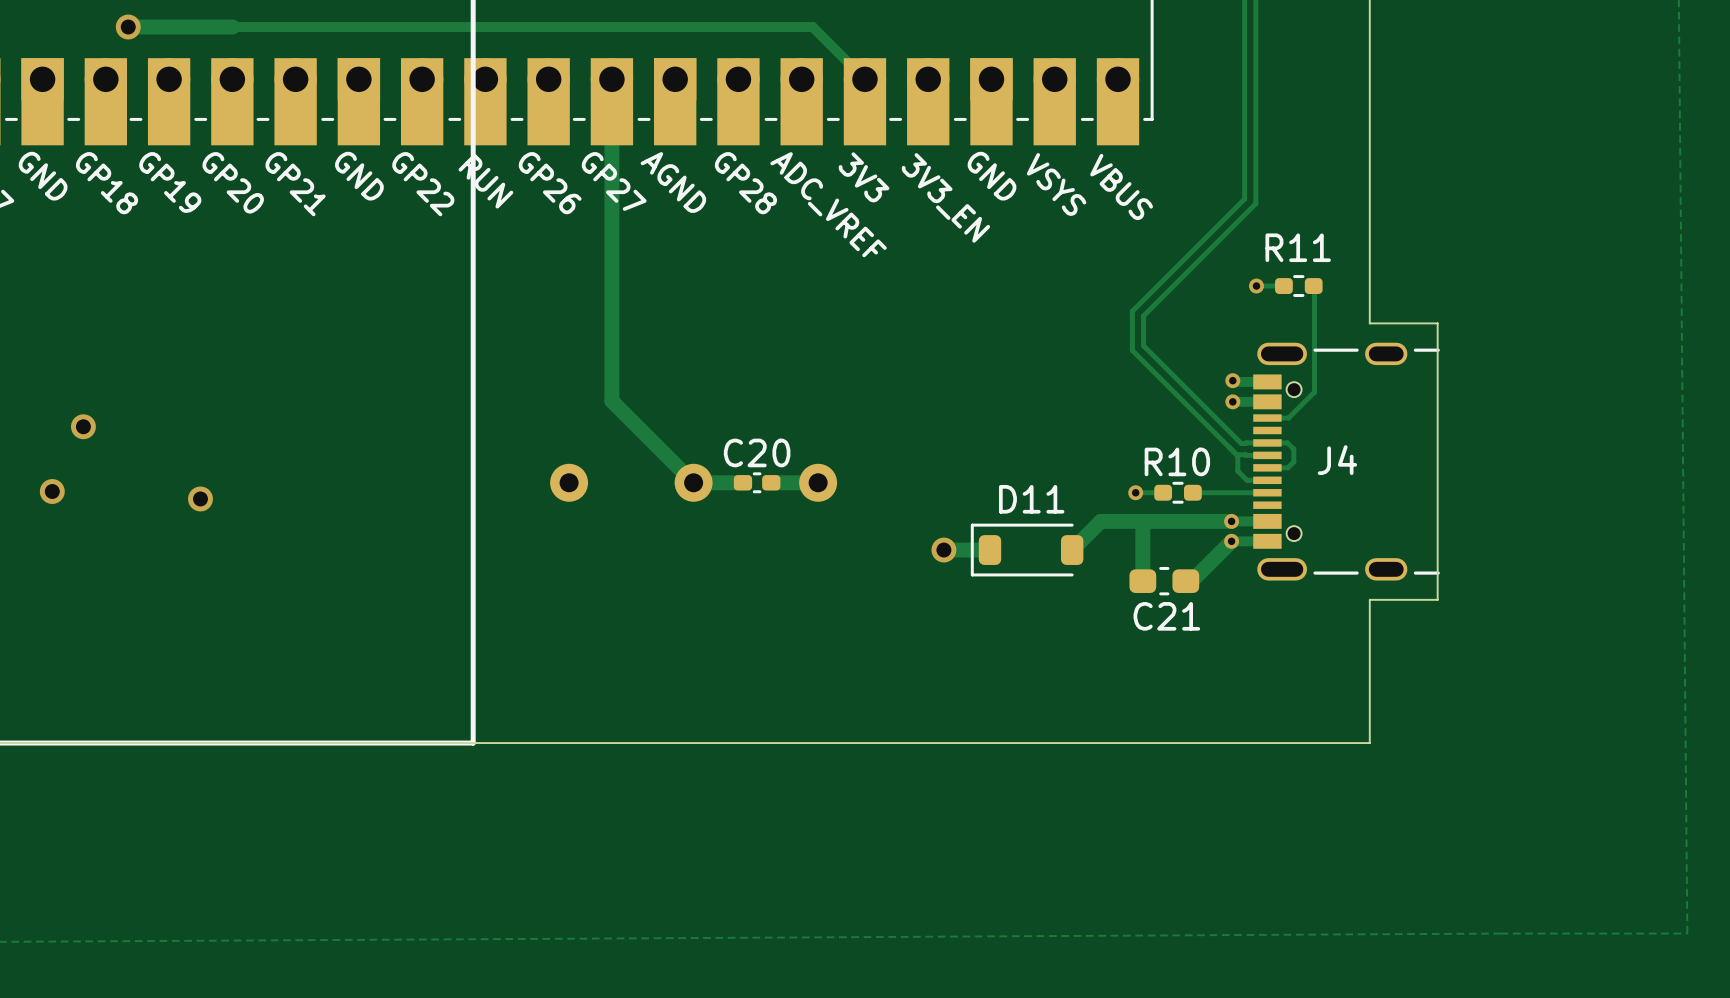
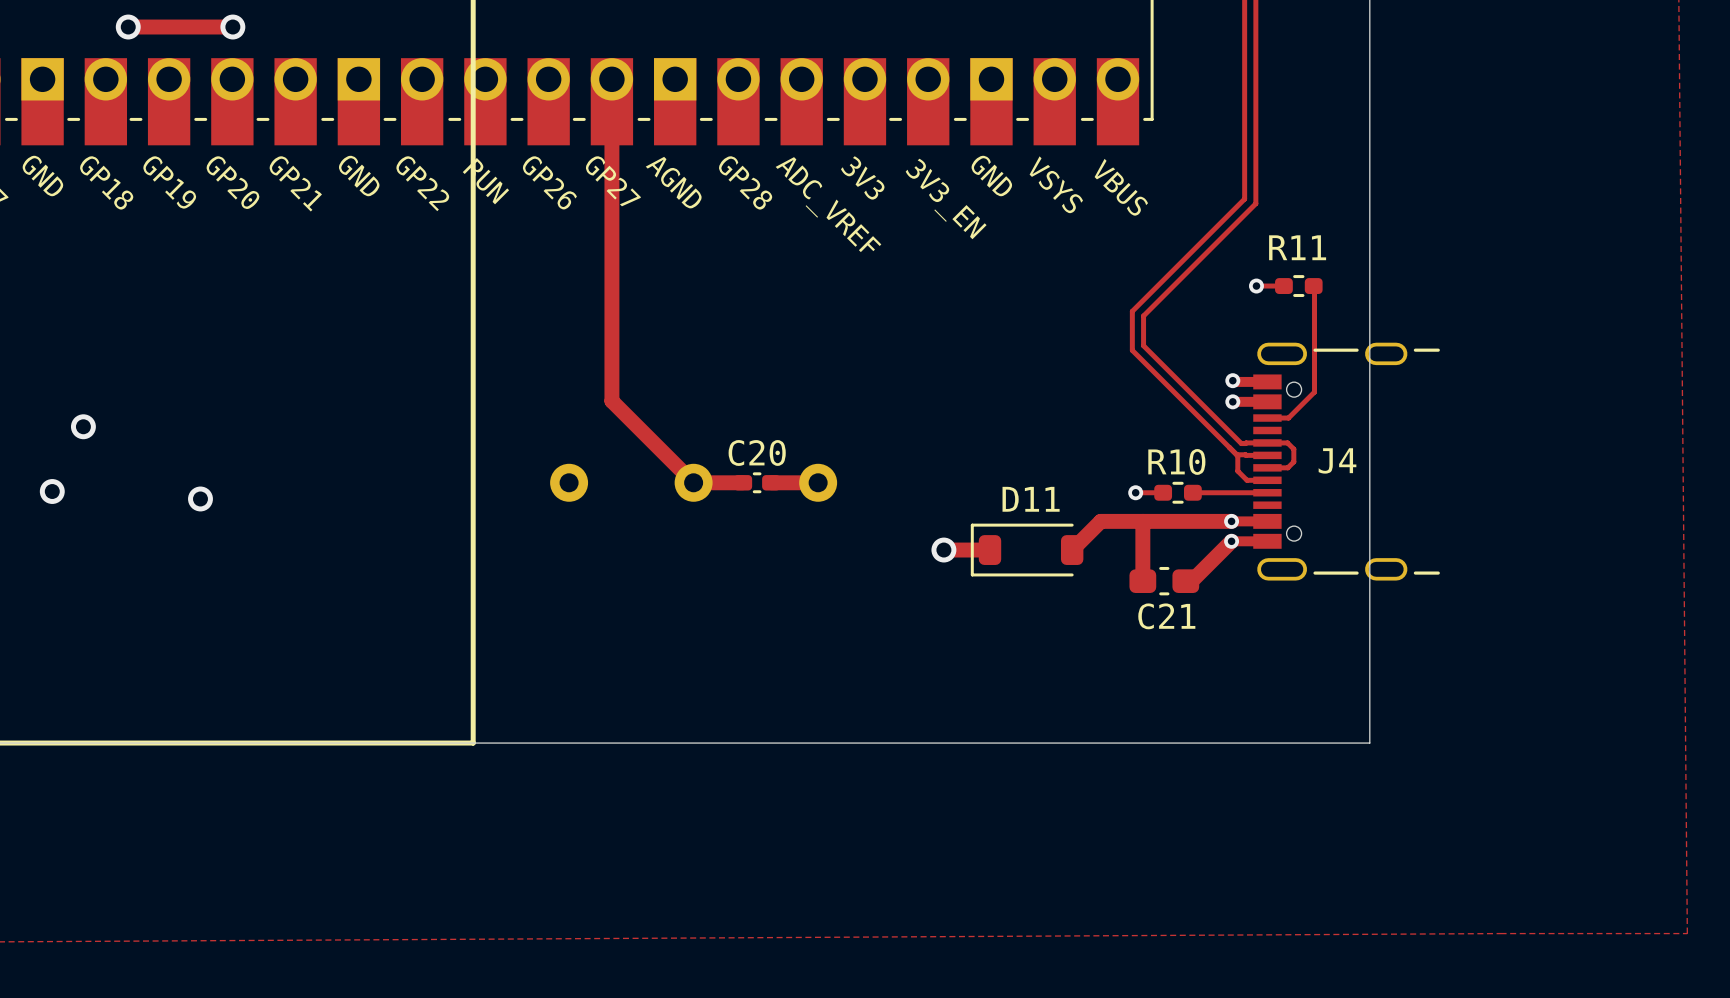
track: (232, 27) (812, 27) (864, 79) -> none
via: none -> (232, 27)
board edge: (1369, 323) (1437, 323) (1437, 599) (1369, 599) -> (1369, 323) (1369, 599)

